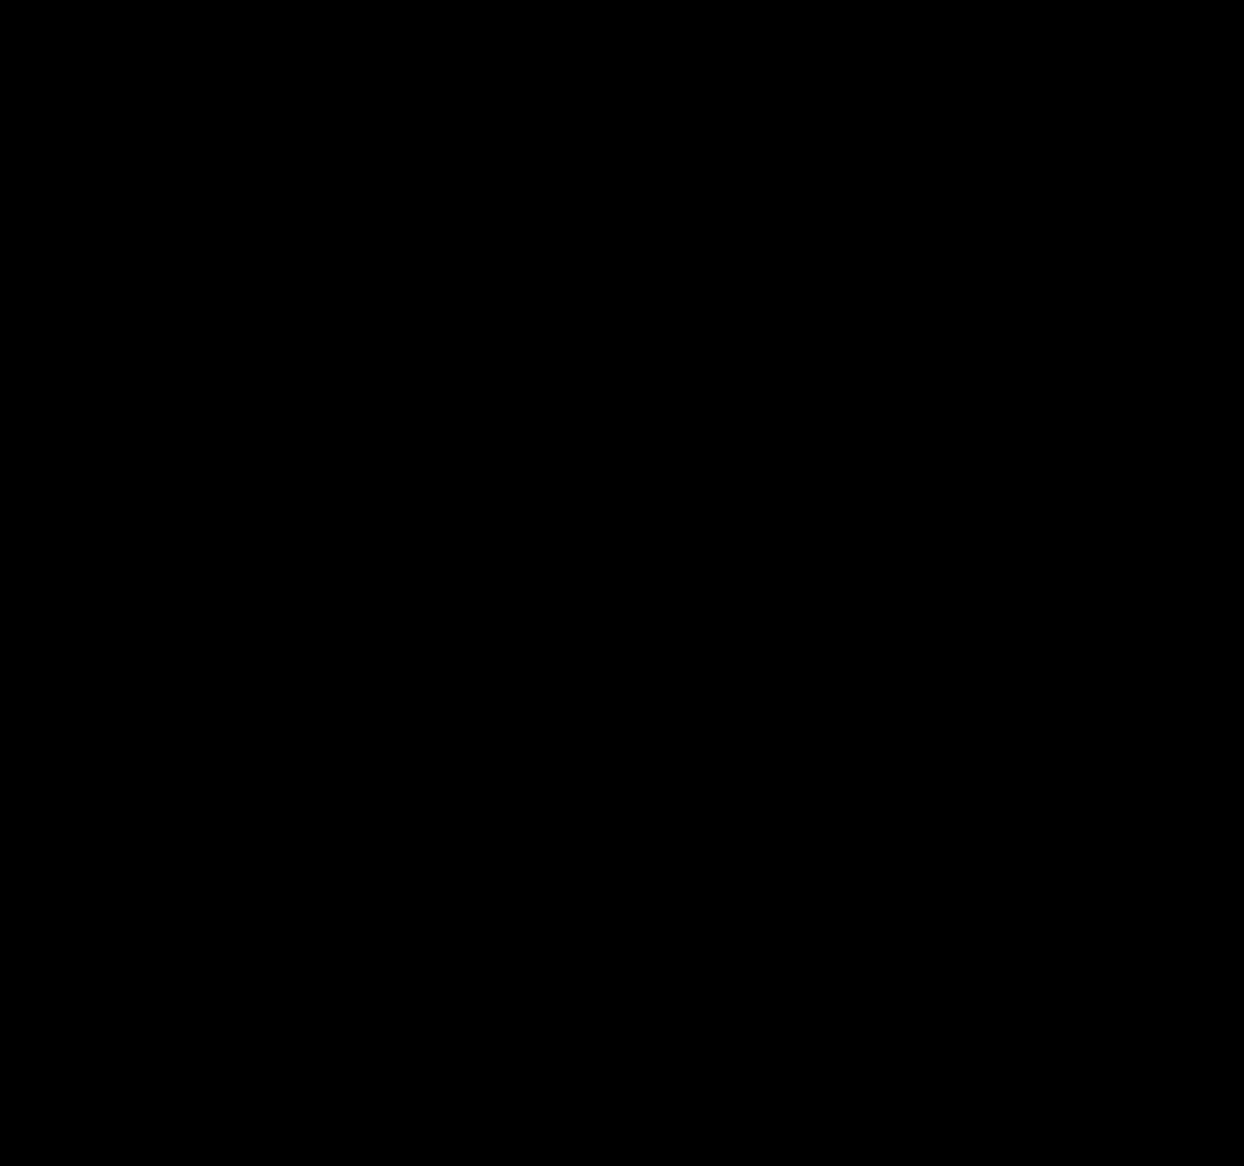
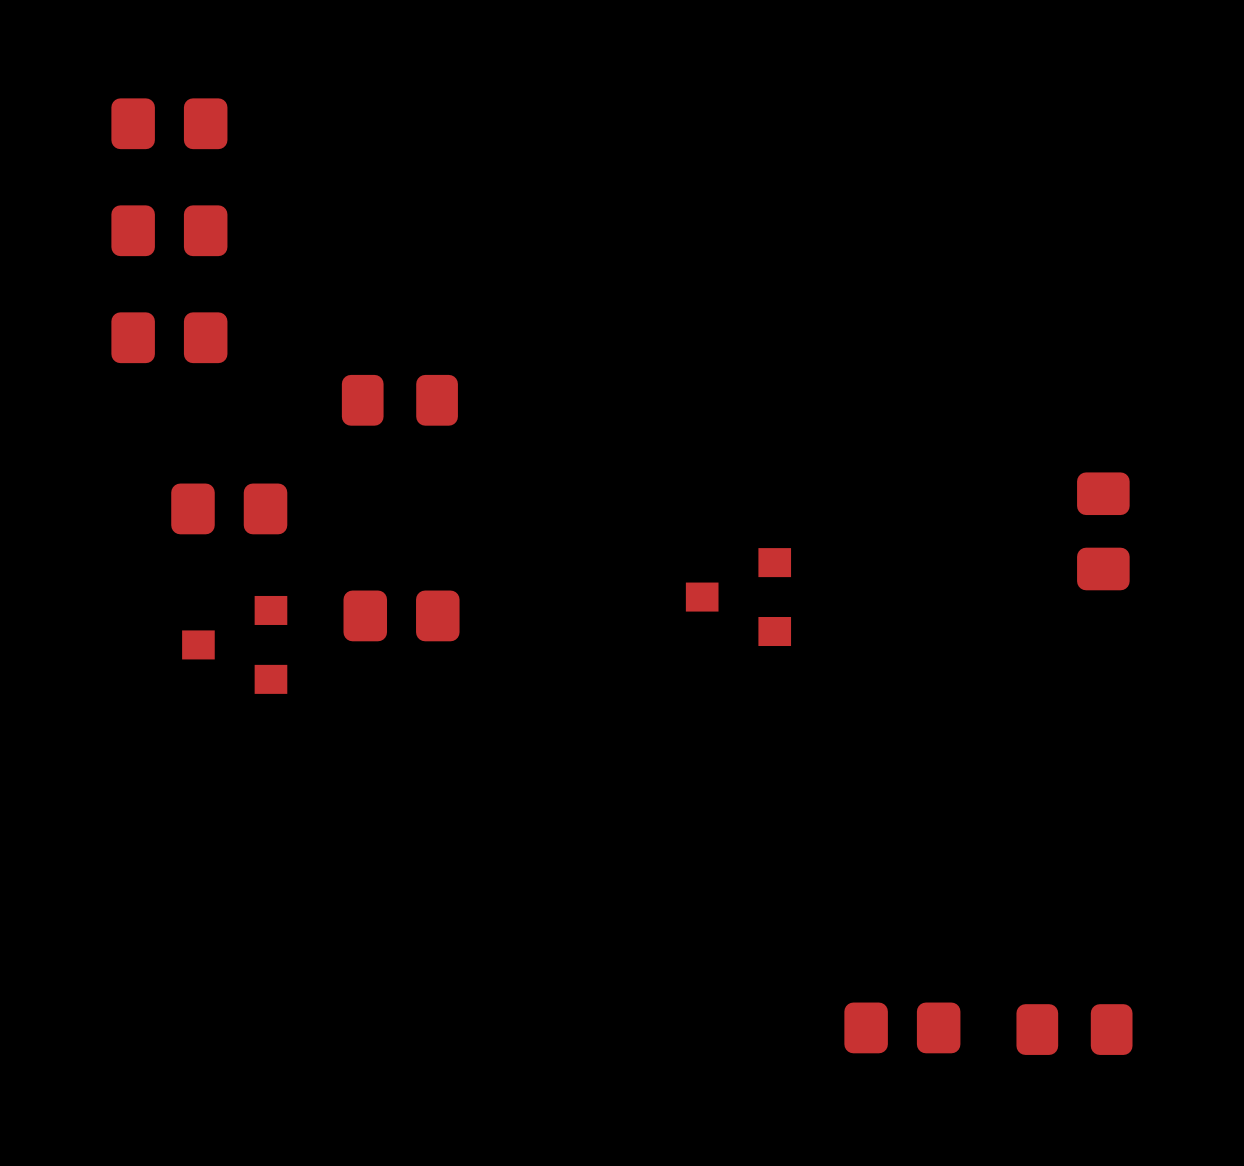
part: none -> (169, 123)
part: none -> (169, 230)
part: none -> (169, 337)
part: none -> (399, 400)
part: none -> (229, 508)
part: none -> (1103, 531)
part: none -> (738, 597)
part: none -> (401, 615)
part: none -> (234, 644)
part: none -> (902, 1027)
part: none -> (1074, 1029)

